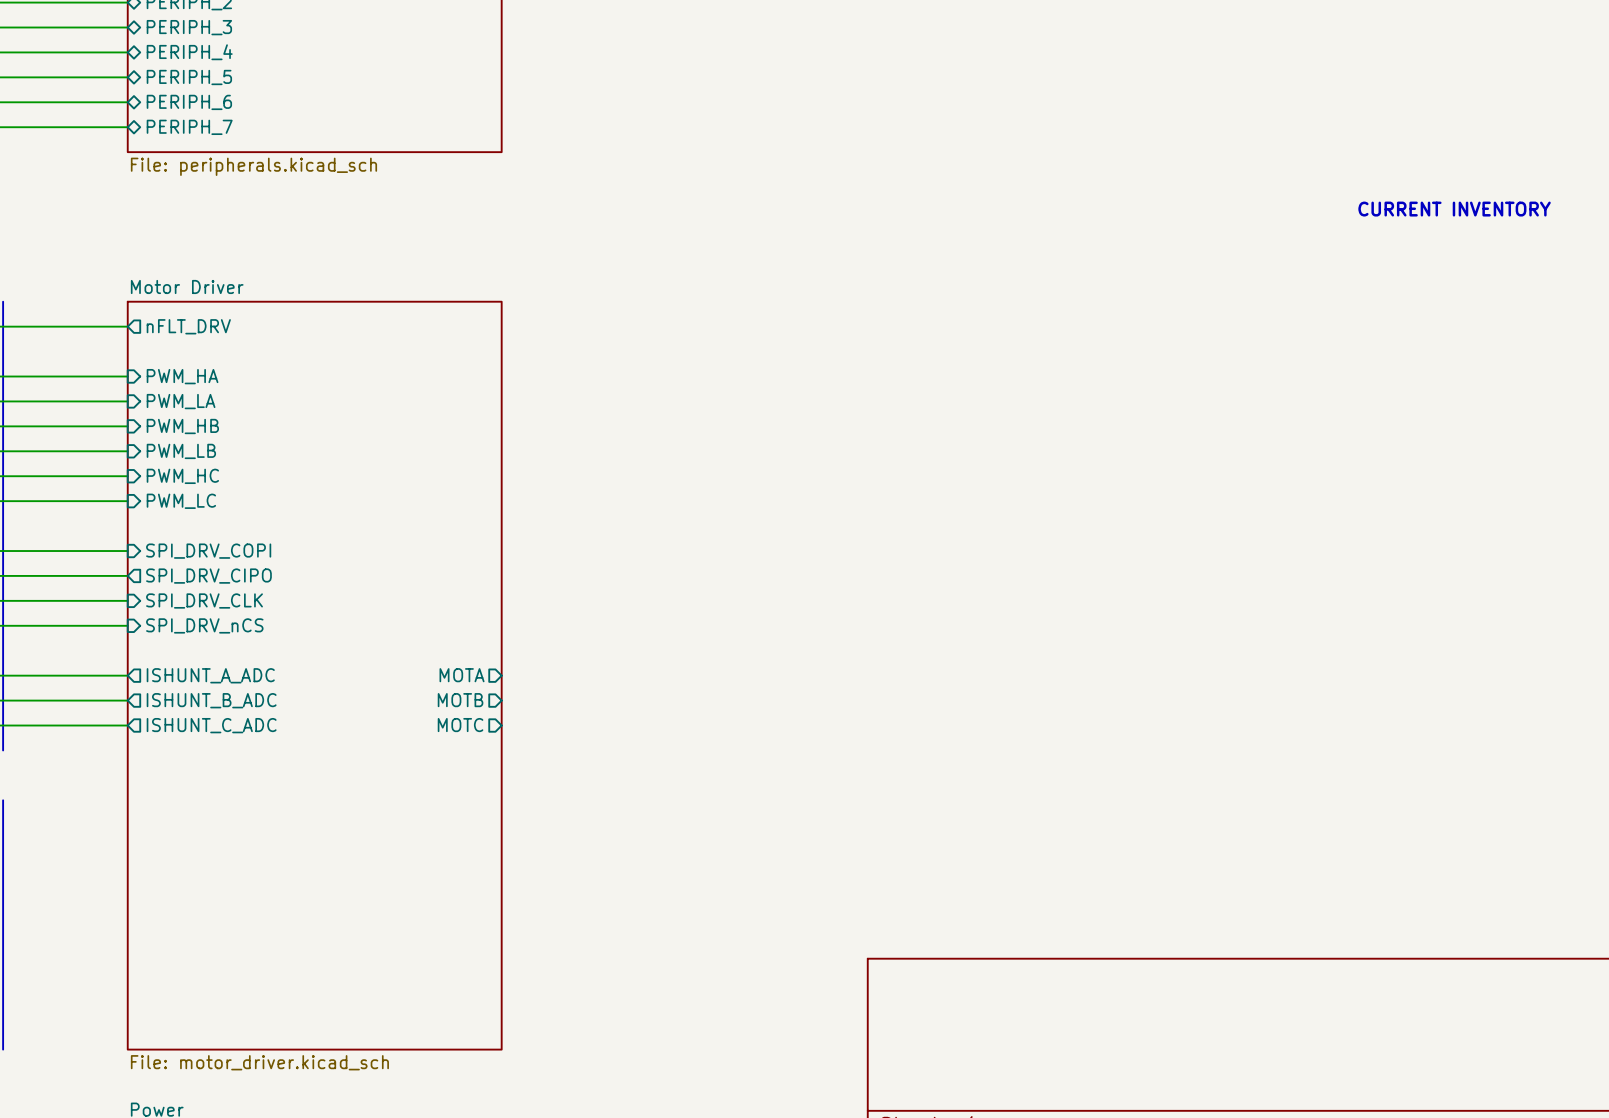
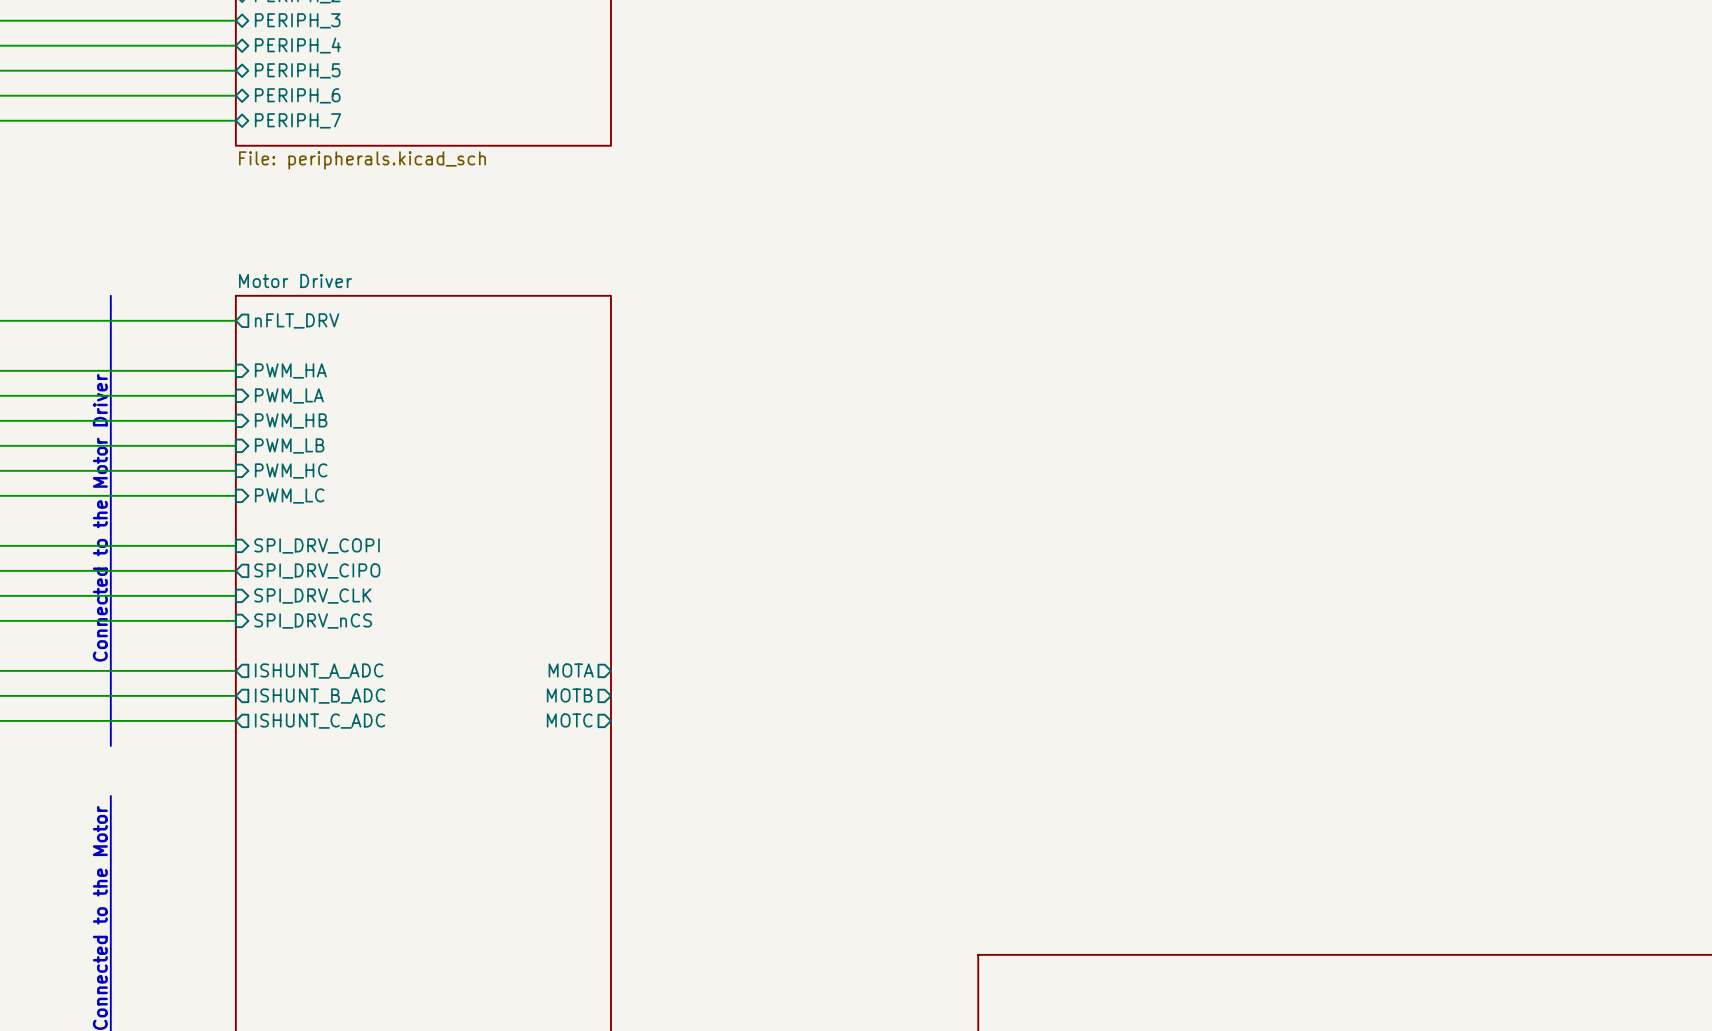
text: CURRENT INVENTORY (1454, 209) -> none

